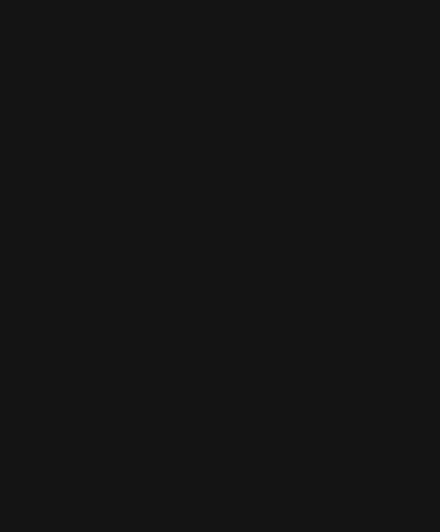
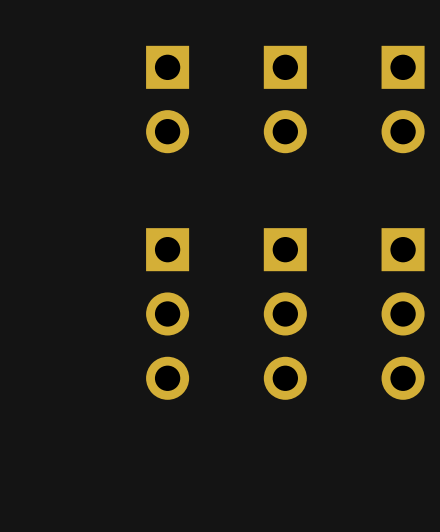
part: none -> (167, 99)
part: none -> (285, 99)
part: none -> (403, 99)
part: none -> (167, 313)
part: none -> (285, 313)
part: none -> (403, 313)

